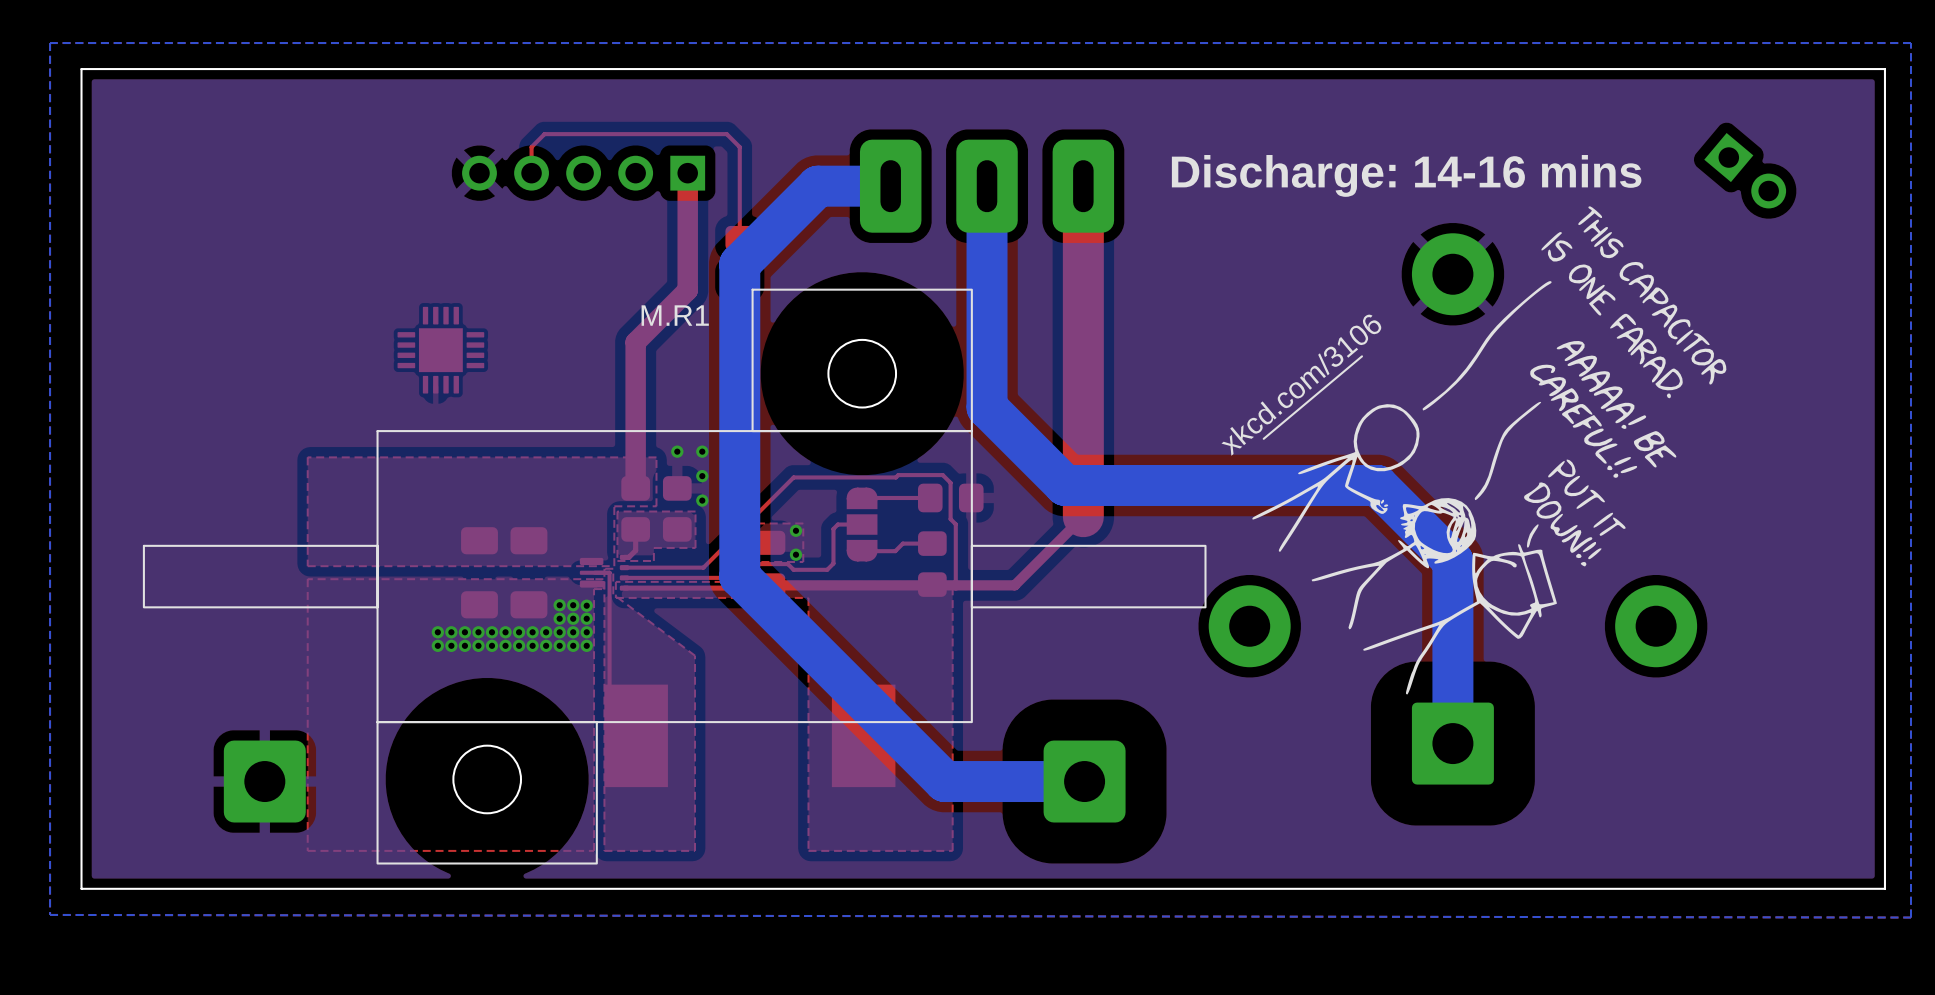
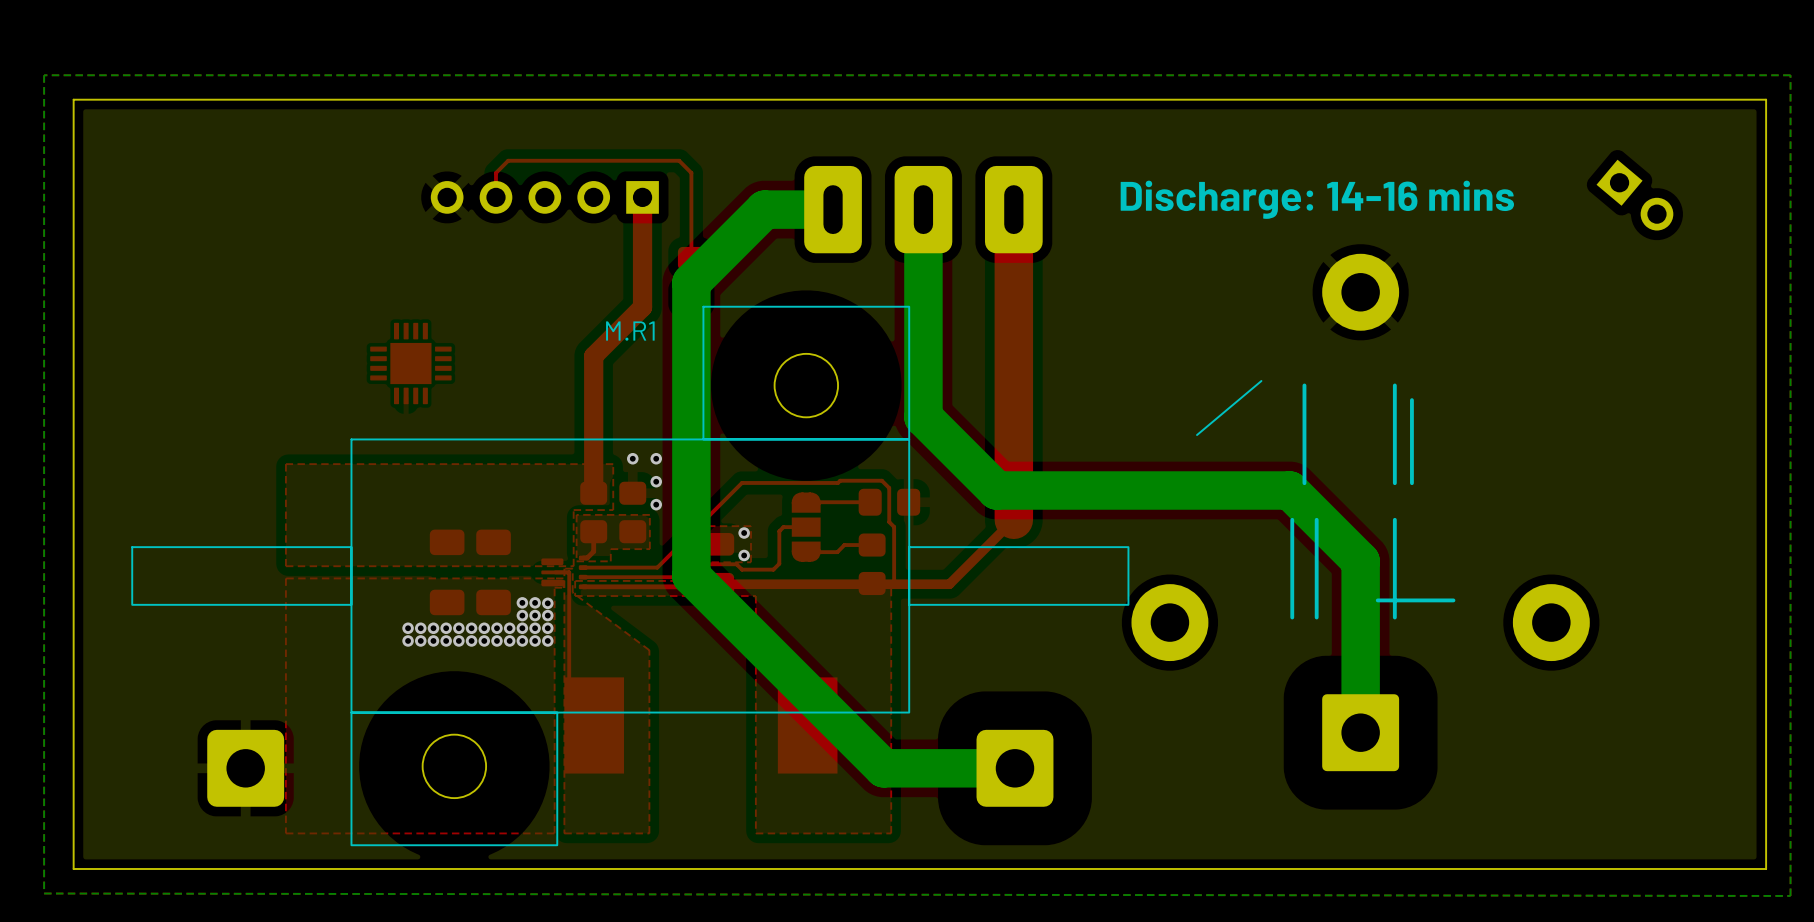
drawing: [1252, 206, 1727, 695] -> none
line: none -> (1304, 385) (1304, 483)
line: none -> (1394, 385) (1394, 483)
text: xkcd.com/3106 (1301, 384) -> none
line: none -> (1411, 400) (1411, 483)
line: none -> (1292, 519) (1292, 617)
line: none -> (1316, 519) (1316, 617)
line: none -> (1394, 519) (1394, 617)
line: none -> (1453, 600) (1377, 600)

